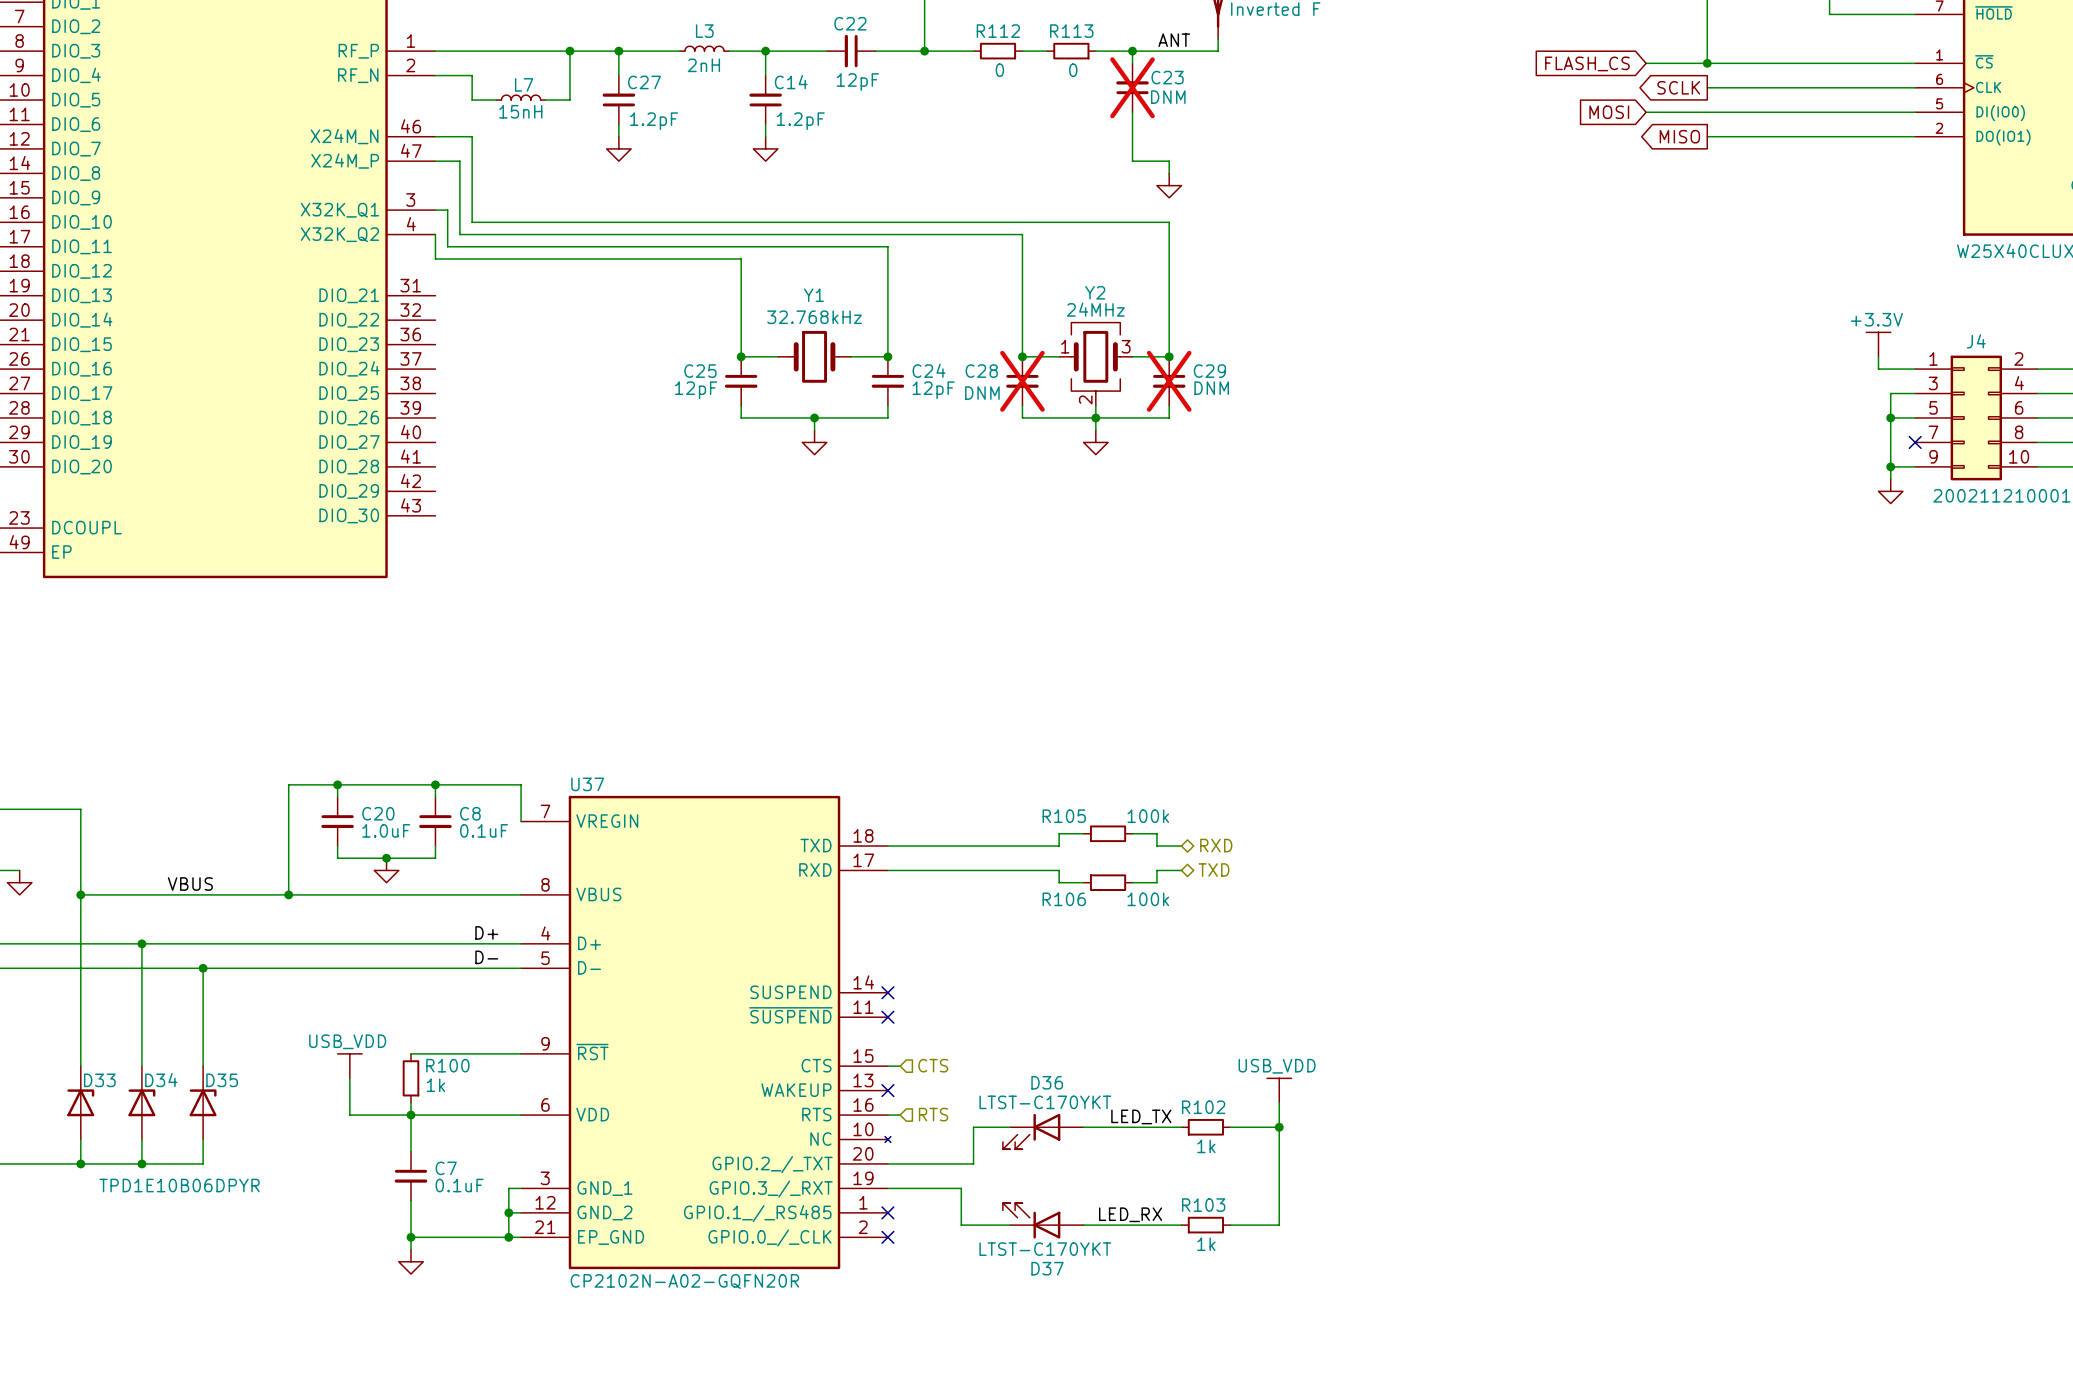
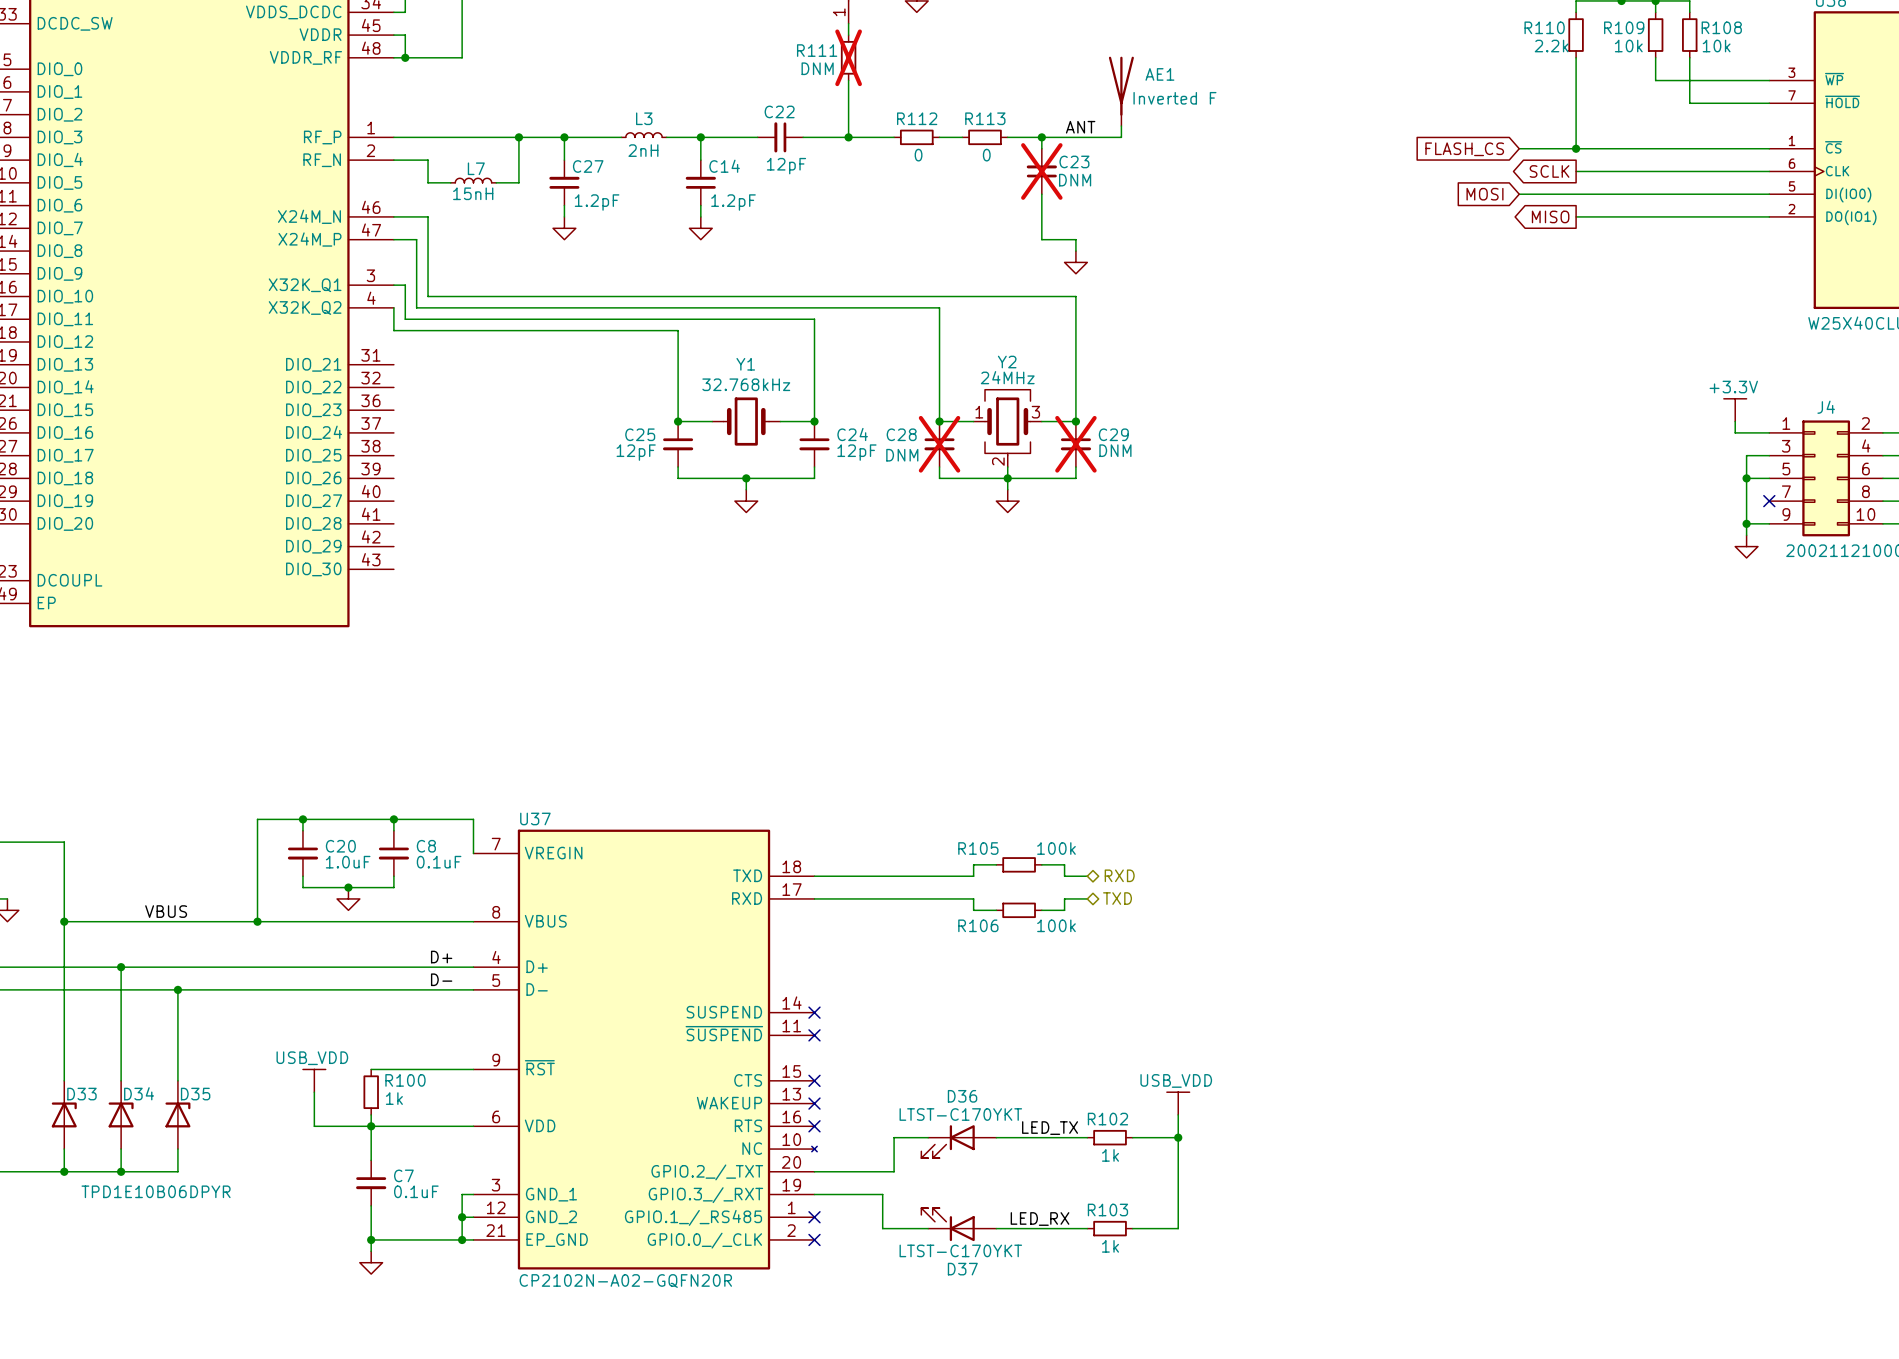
hierarchical label: CTS (933, 1065) -> none
wire: (887, 1066) (900, 1066) -> none
no-connect mark: none -> (814, 1080)
hierarchical label: RTS (933, 1114) -> none
wire: (887, 1115) (900, 1115) -> none
no-connect mark: none -> (814, 1126)

